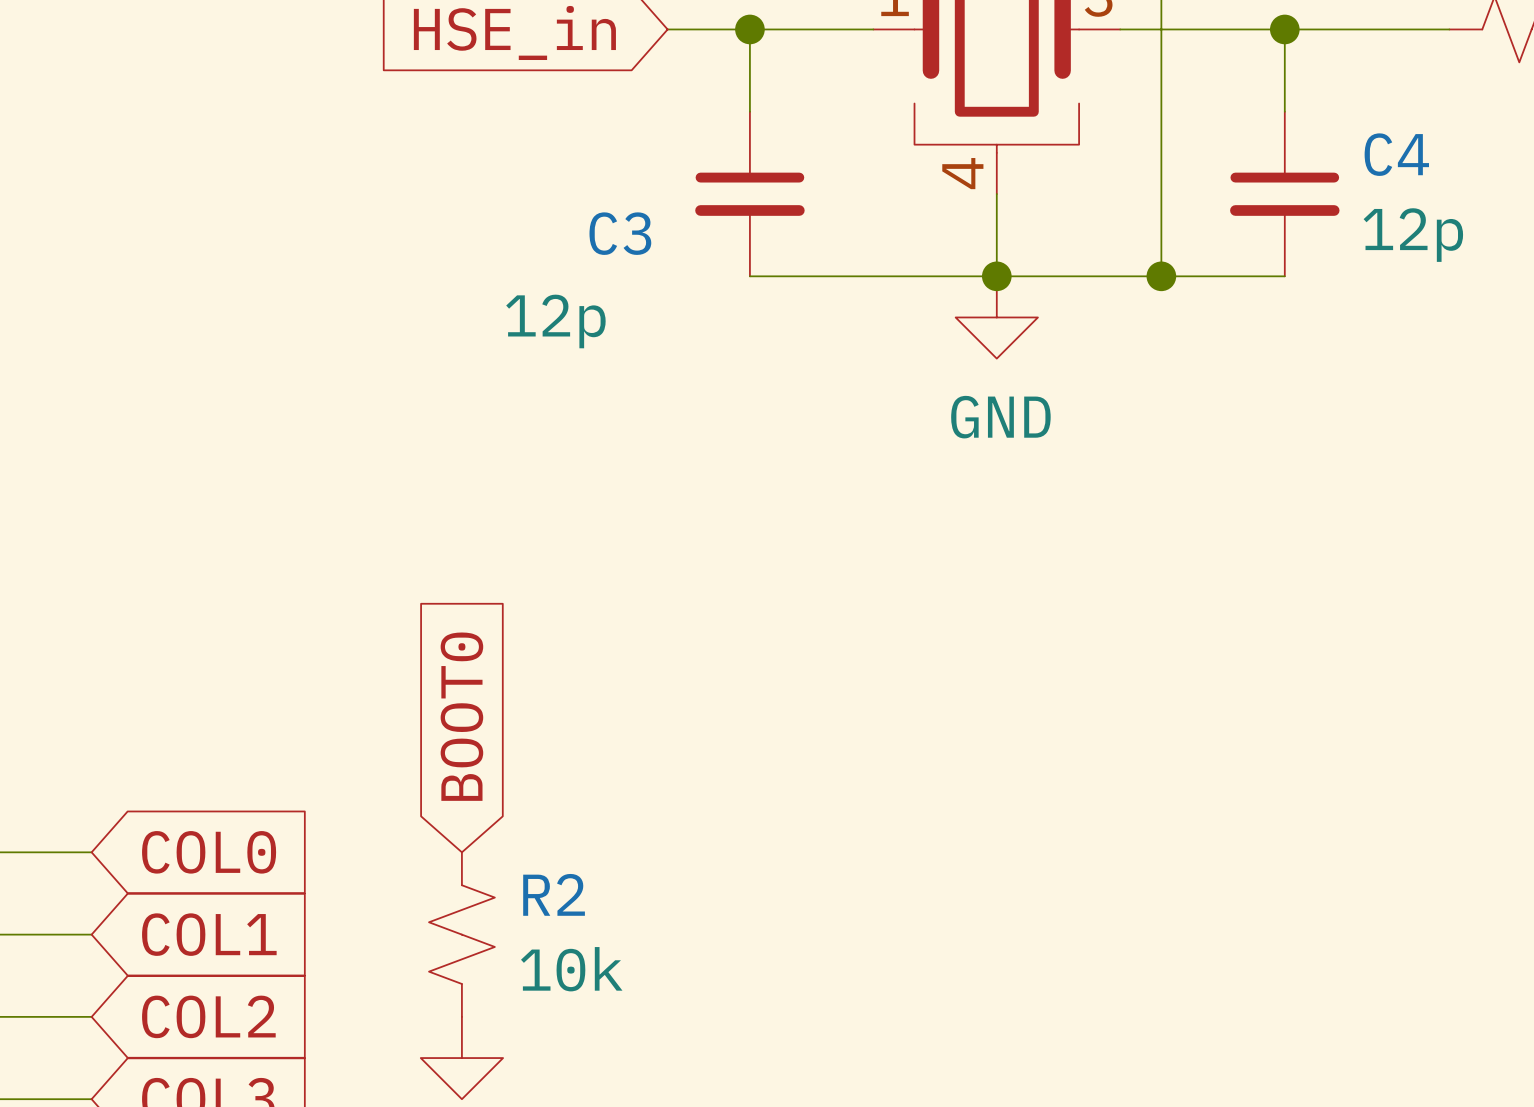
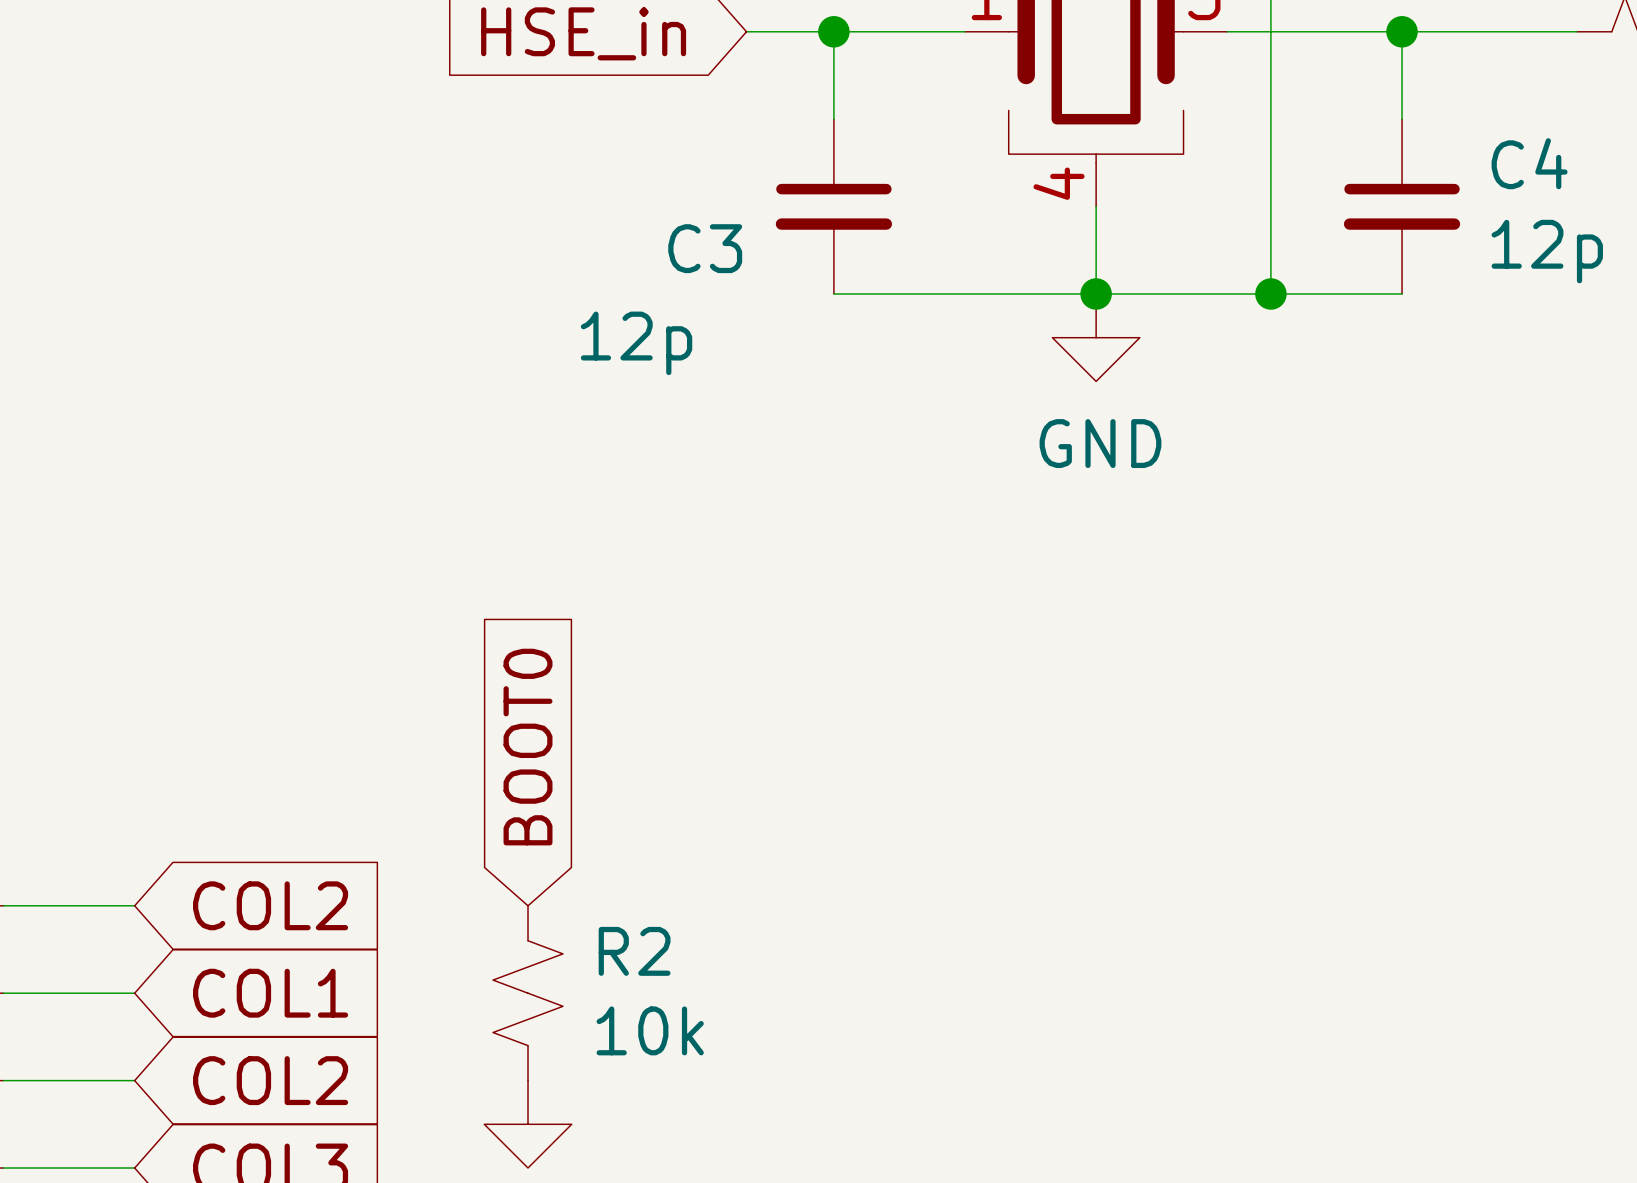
global label: COL0 (209, 852) -> COL2 (270, 905)

